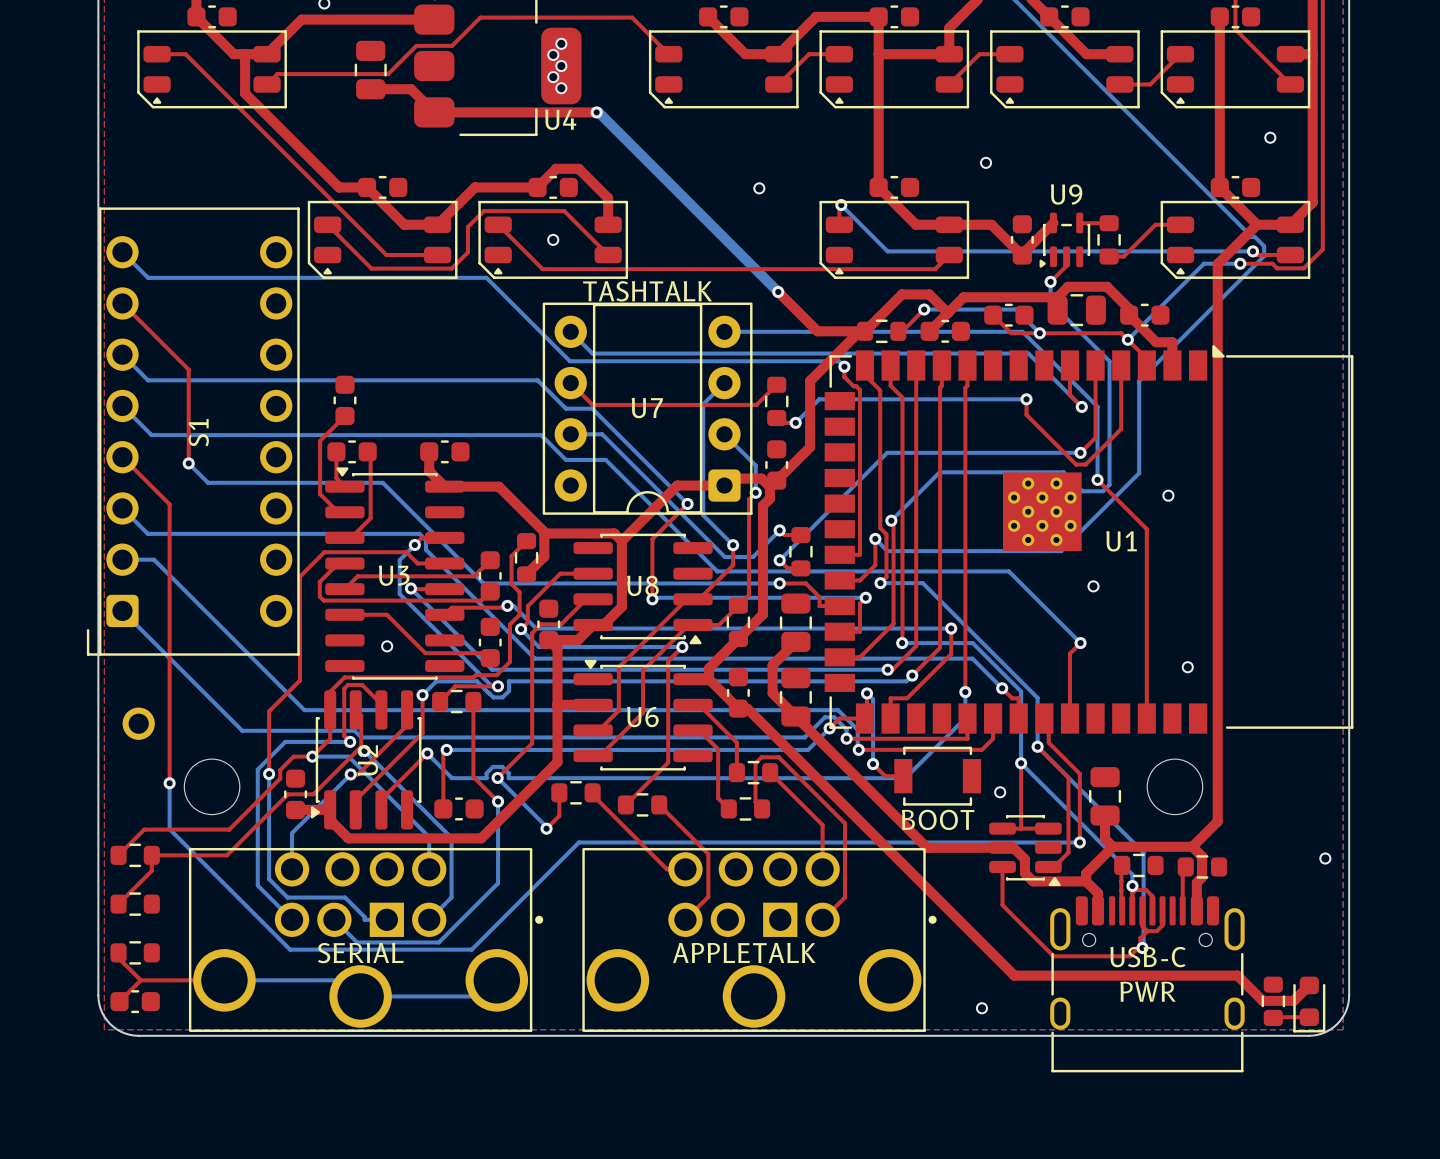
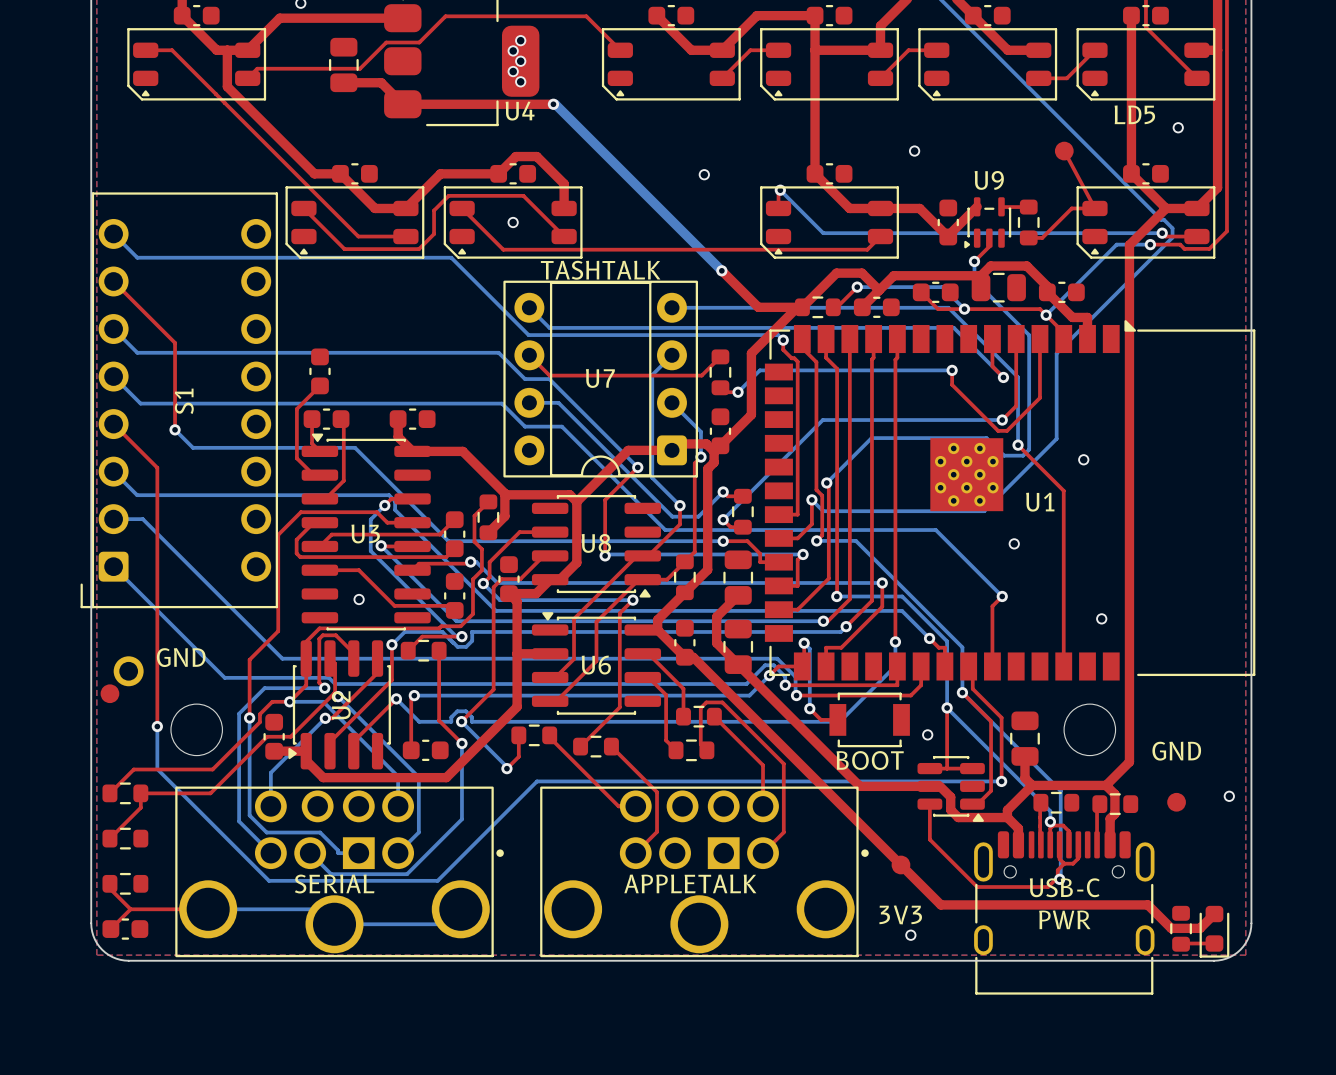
top track: none -> (1064, 151) (1094, 208)
part: none -> (1064, 151)
part: none -> (109, 693)
part: none -> (1176, 802)
part: none -> (900, 864)

